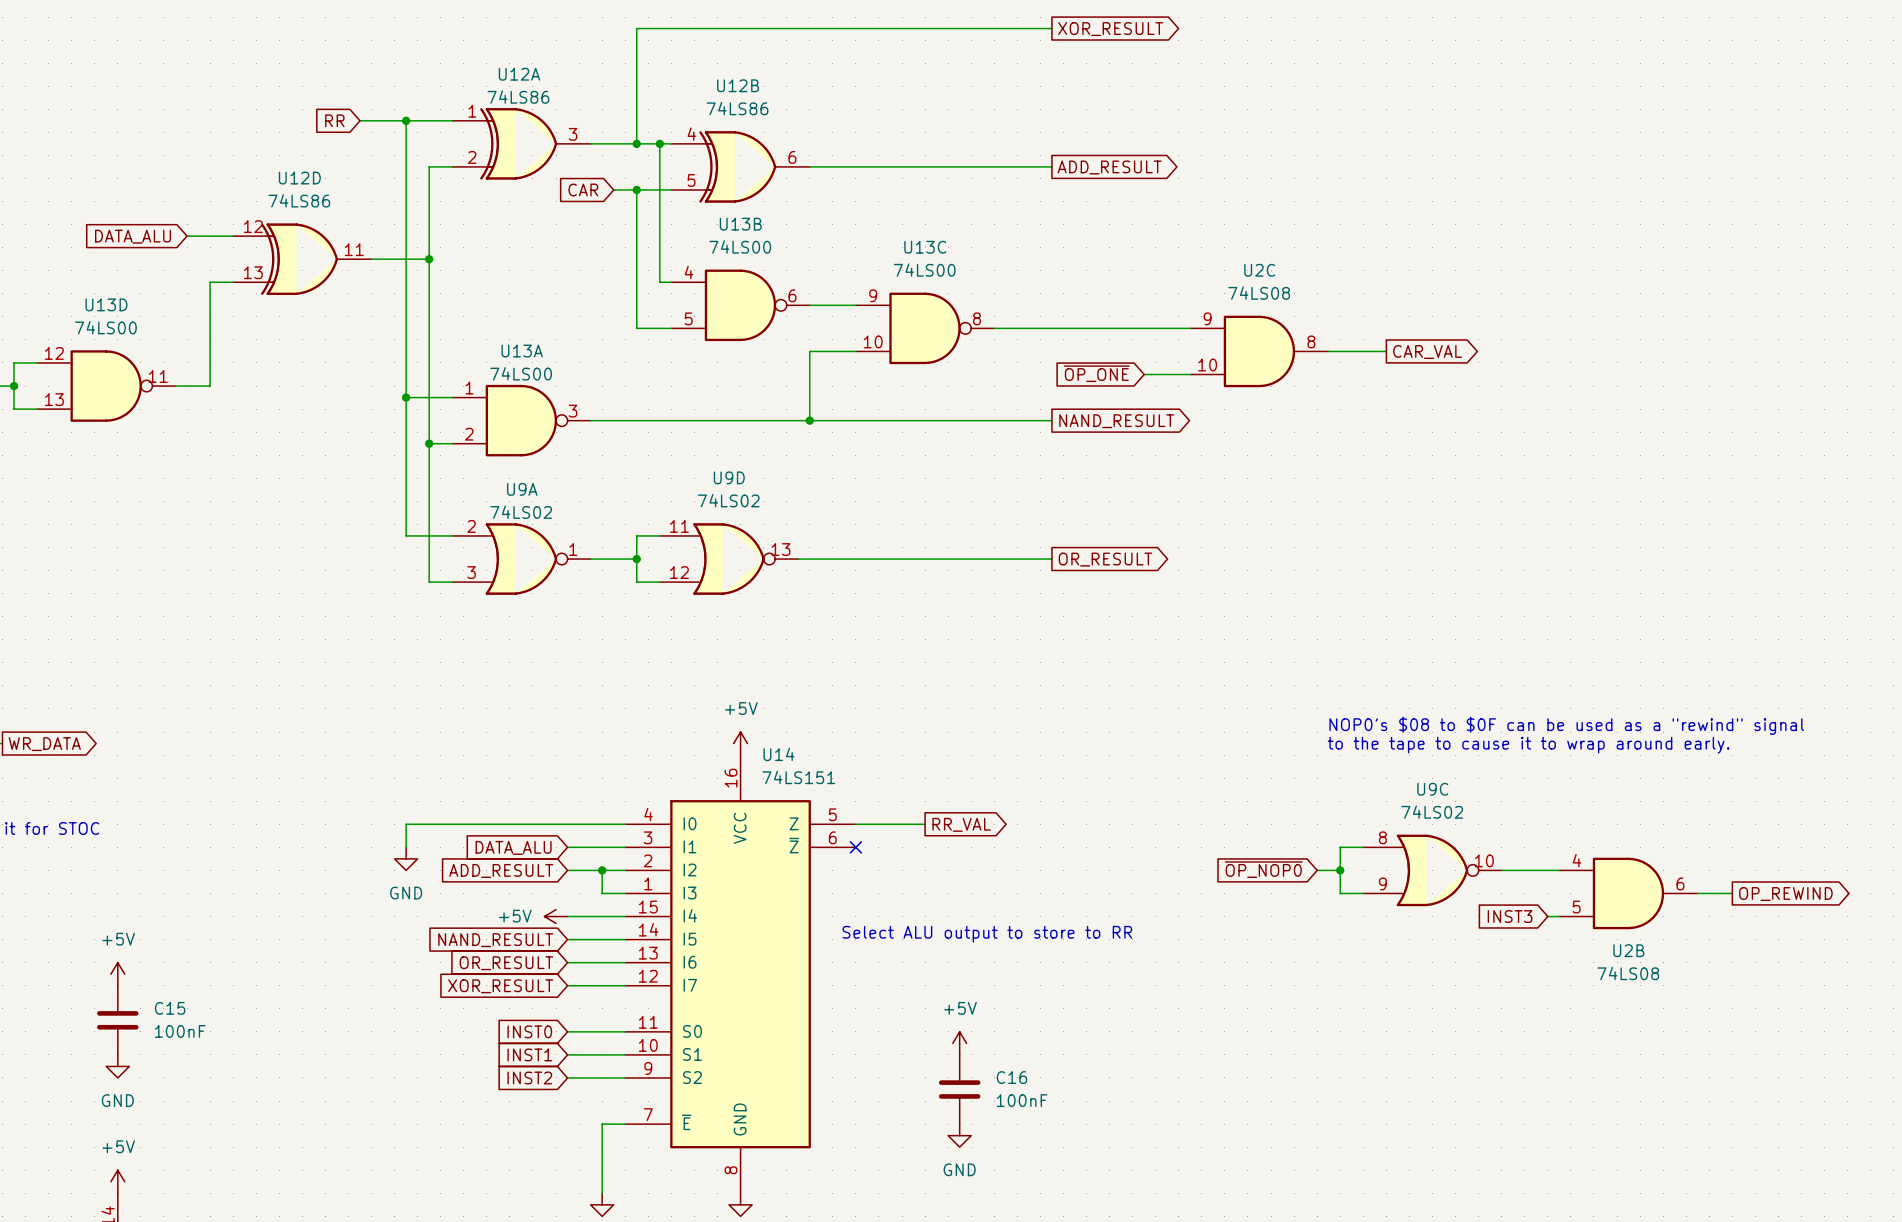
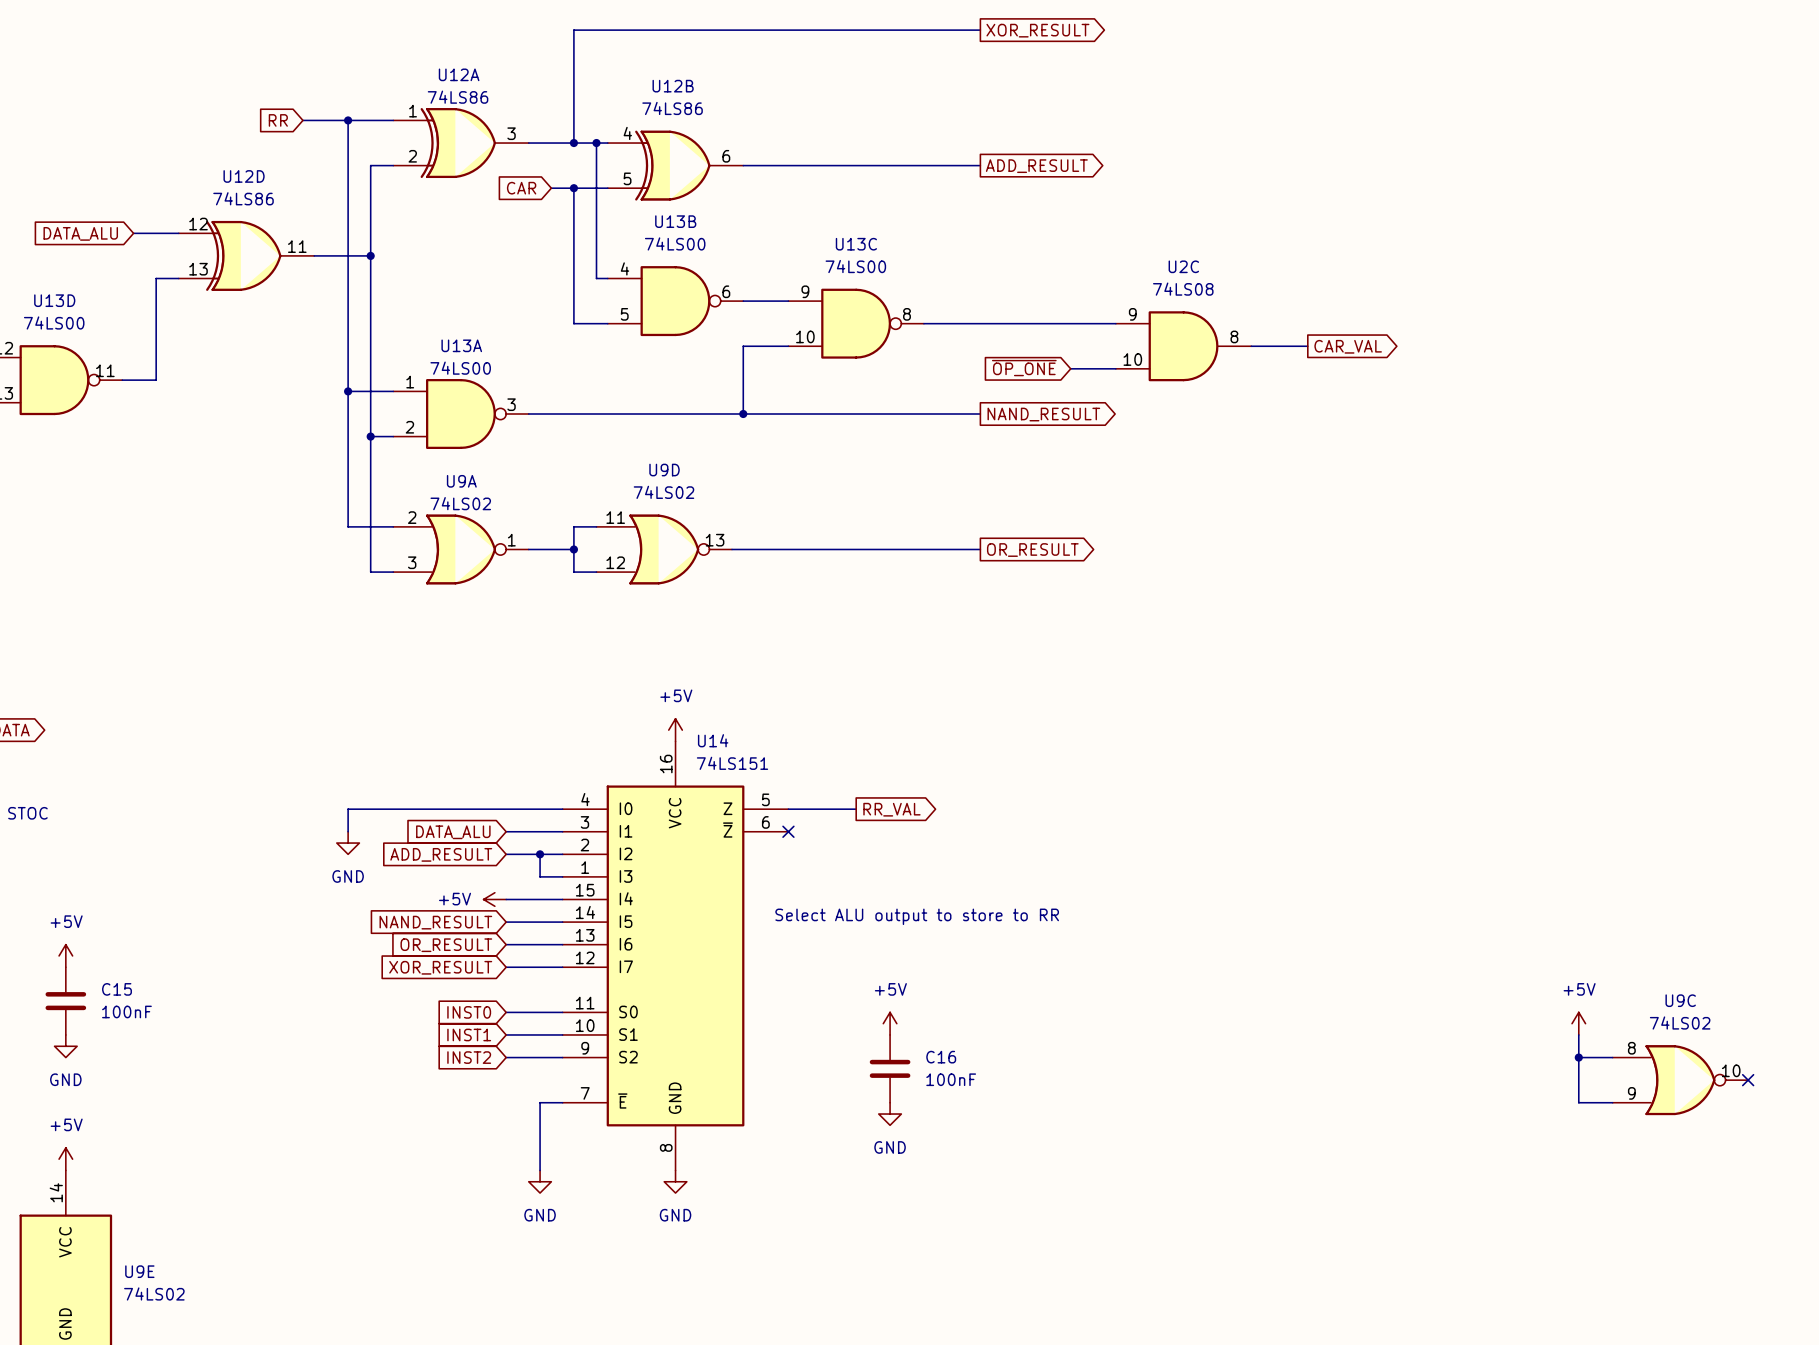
text: NOP0's $08 to $0F can be used as a "rewind" signal (1566, 725) -> none
text: to the tape to cause it to wrap around early. (1528, 745) -> none
wire: (1363, 847) (1340, 847) (1340, 893) (1363, 893) -> none
global label: ~{OP_NOP0} (1263, 869) -> none
wire: (1317, 870) (1340, 870) -> none
junction: (1340, 870) -> none
U9C position: (1432, 870) -> (1680, 1080)
wire: (1501, 870) (1559, 870) -> none
U2B: 74LS08 (1628, 893) -> none
wire: (1697, 893) (1732, 893) -> (1578, 1057) (1612, 1057)
global label: OP_REWIND (1785, 894) -> none
global label: INST3 (1510, 916) -> none
wire: (1547, 916) (1559, 916) -> none
power symbol: none -> +5V (1578, 1023)
wire: none -> (1578, 1034) (1578, 1102) (1612, 1102)
junction: none -> (1578, 1057)
no-connect mark: none -> (1748, 1080)

